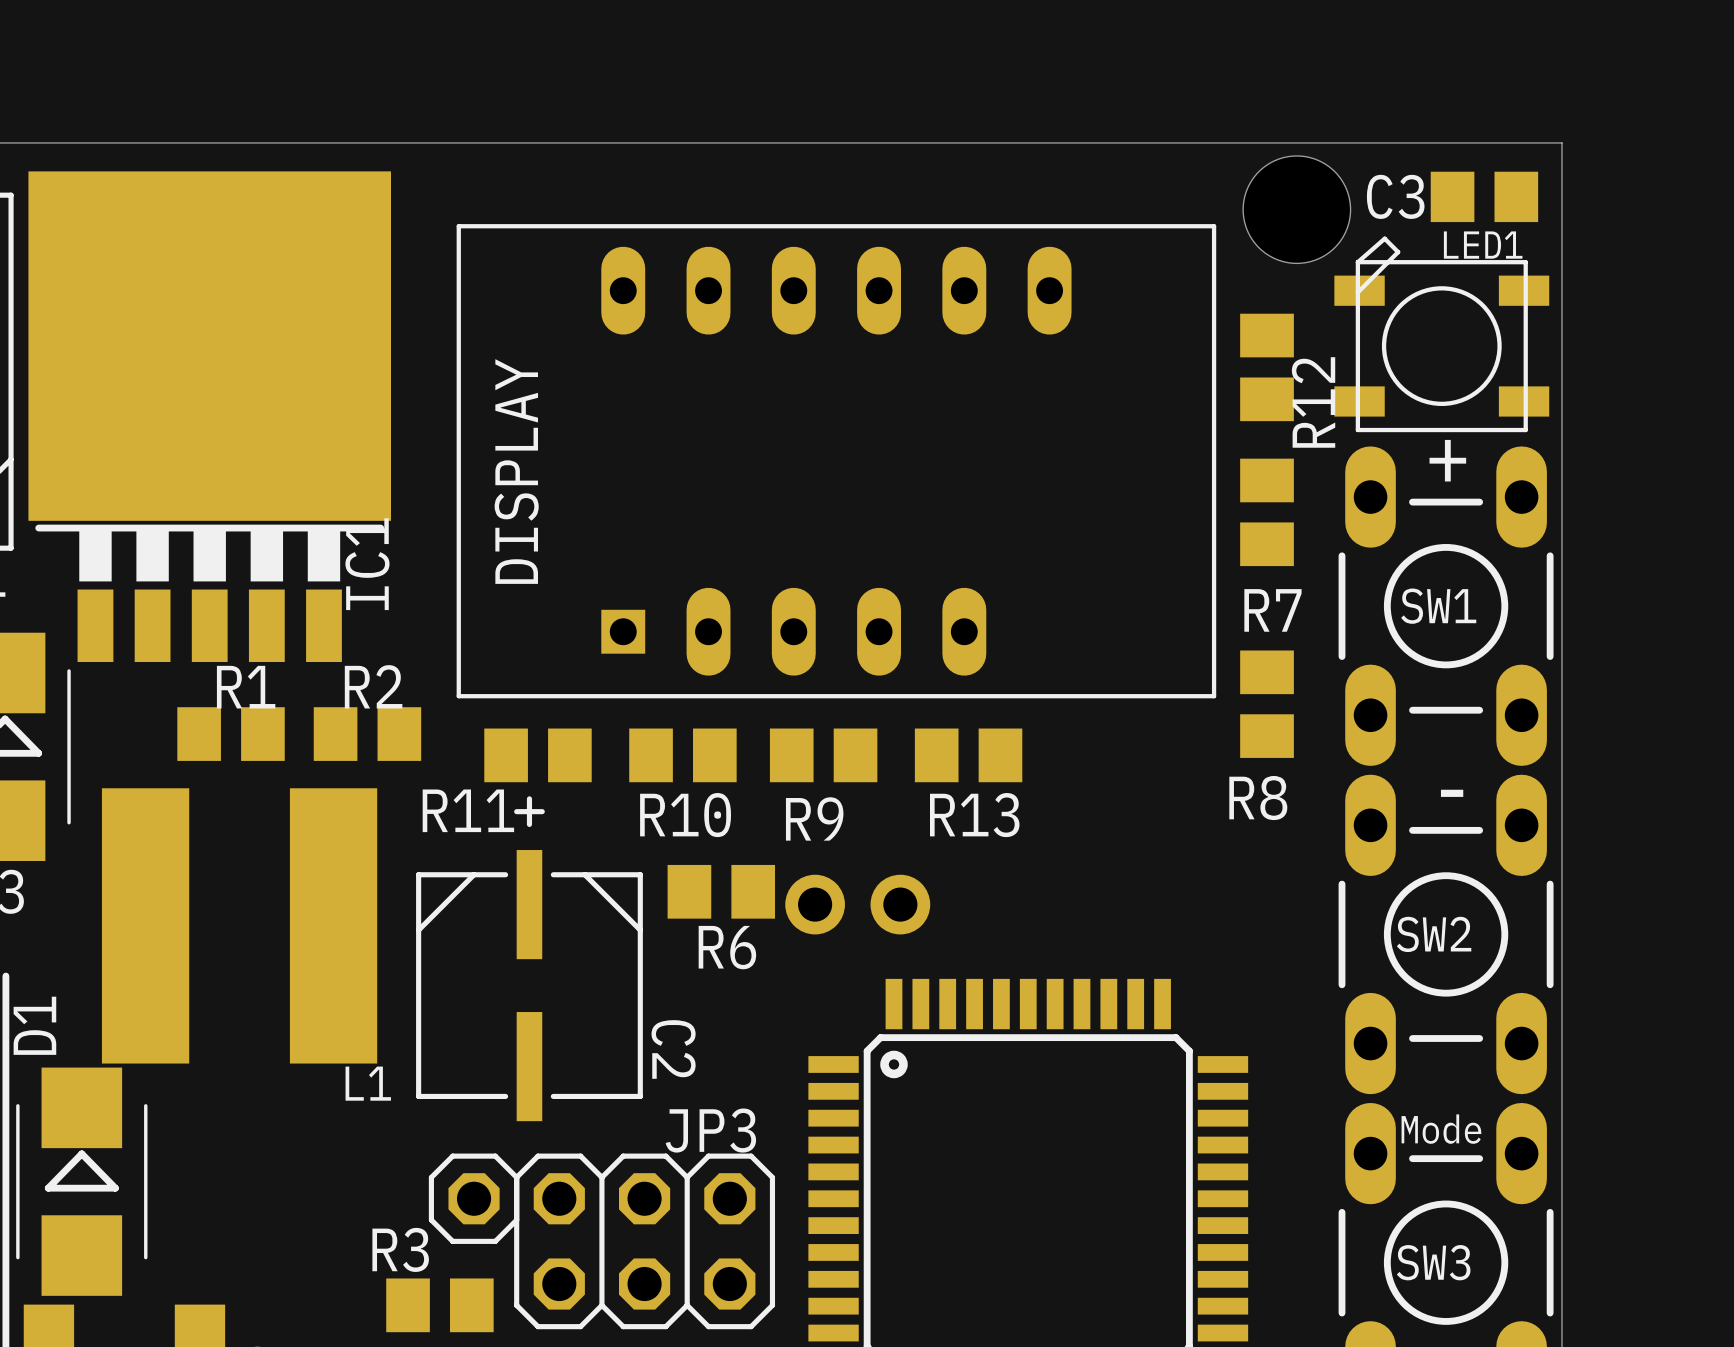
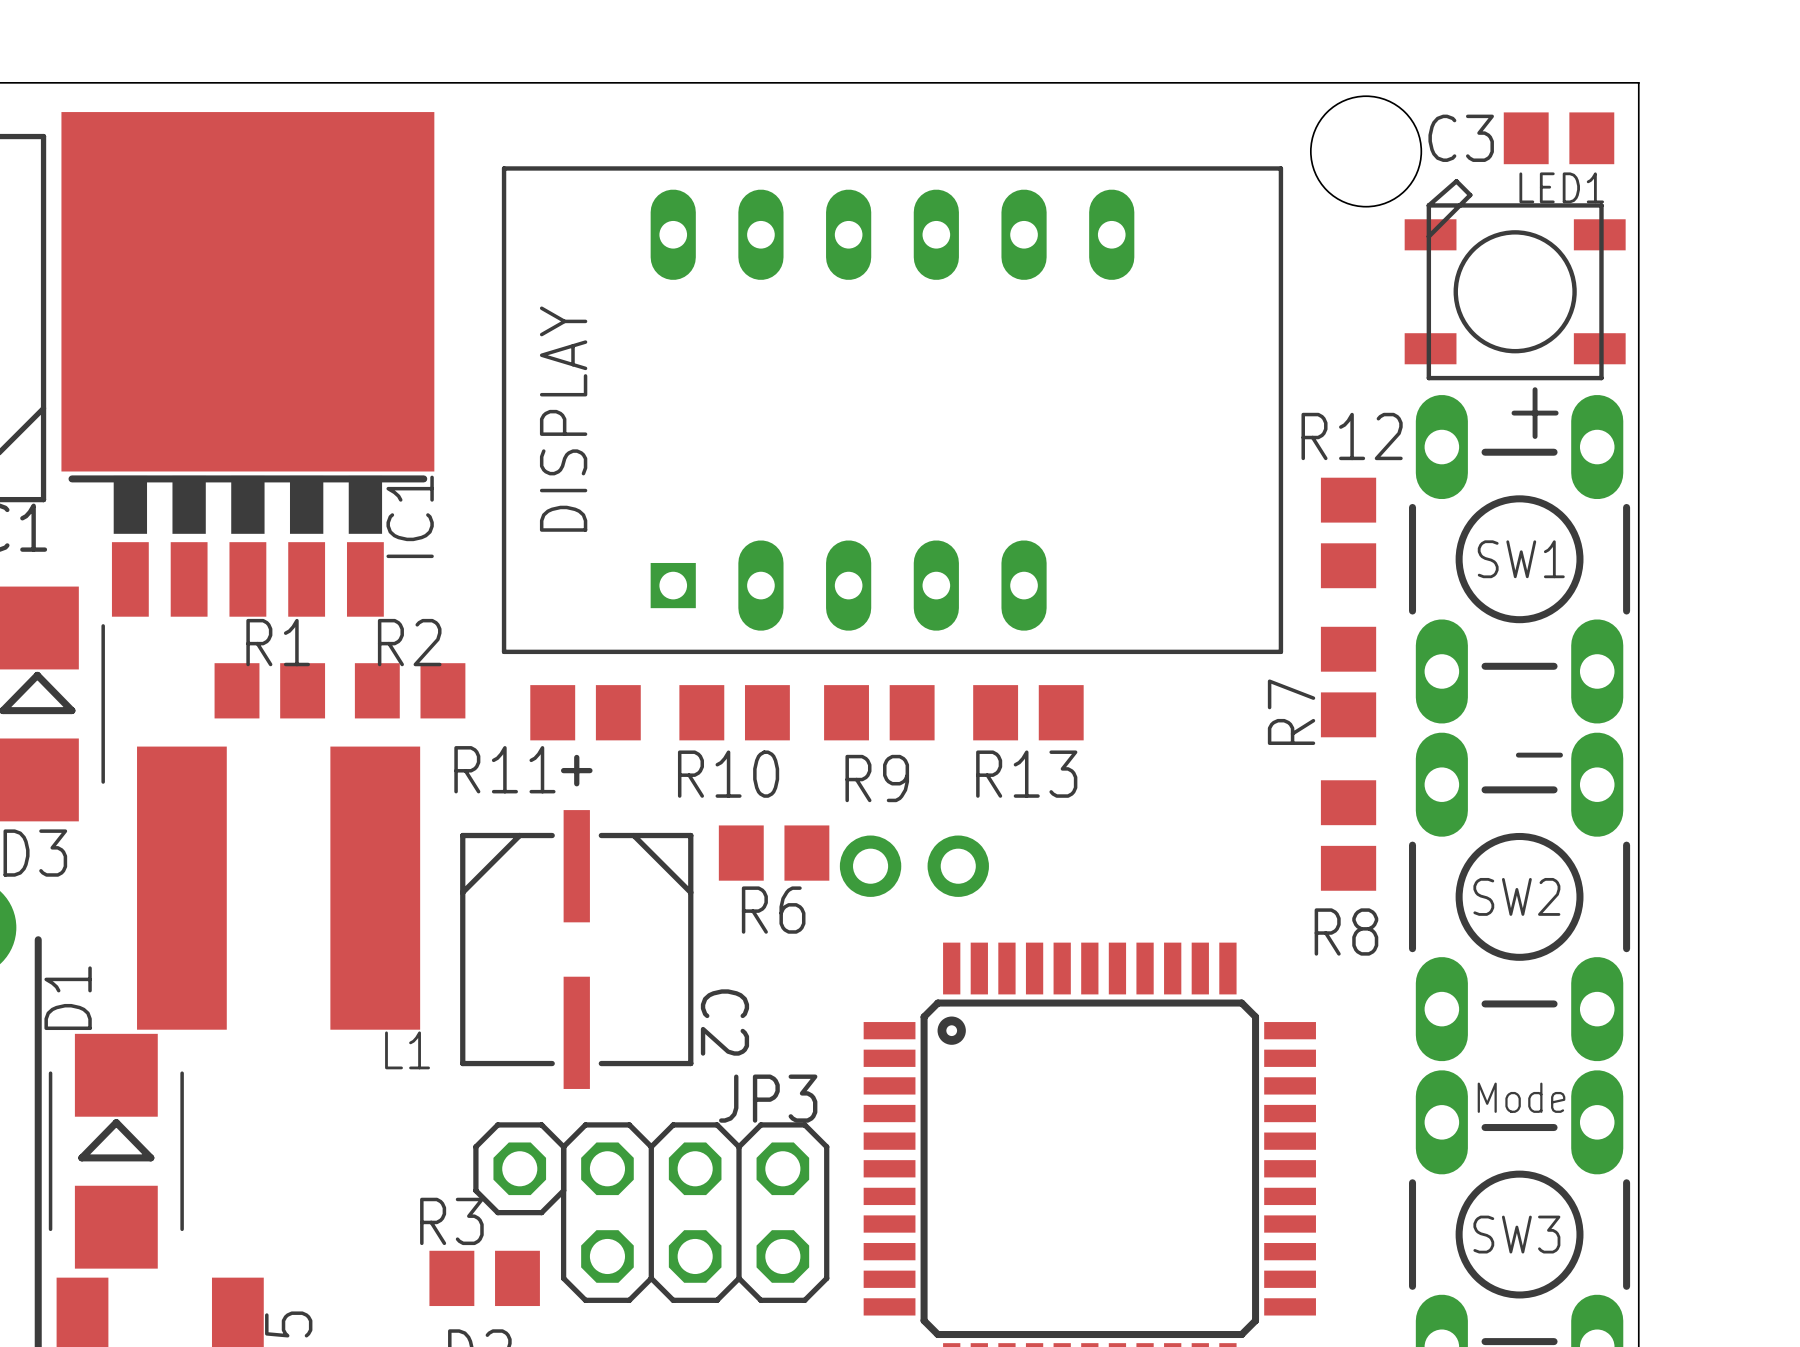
R12 position: (1267, 367) -> (1348, 532)
R12 name rotation: 0° (1313, 402) -> 90° clockwise (1352, 436)
R7 position: (1267, 512) -> (1348, 682)
R7 name rotation: 0° (1272, 610) -> 90° counterclockwise (1291, 712)
R8 position: (1267, 704) -> (1348, 835)

